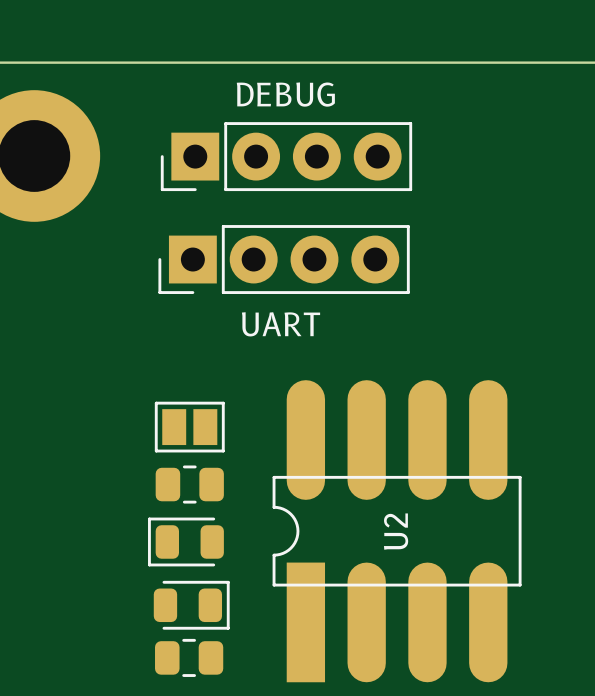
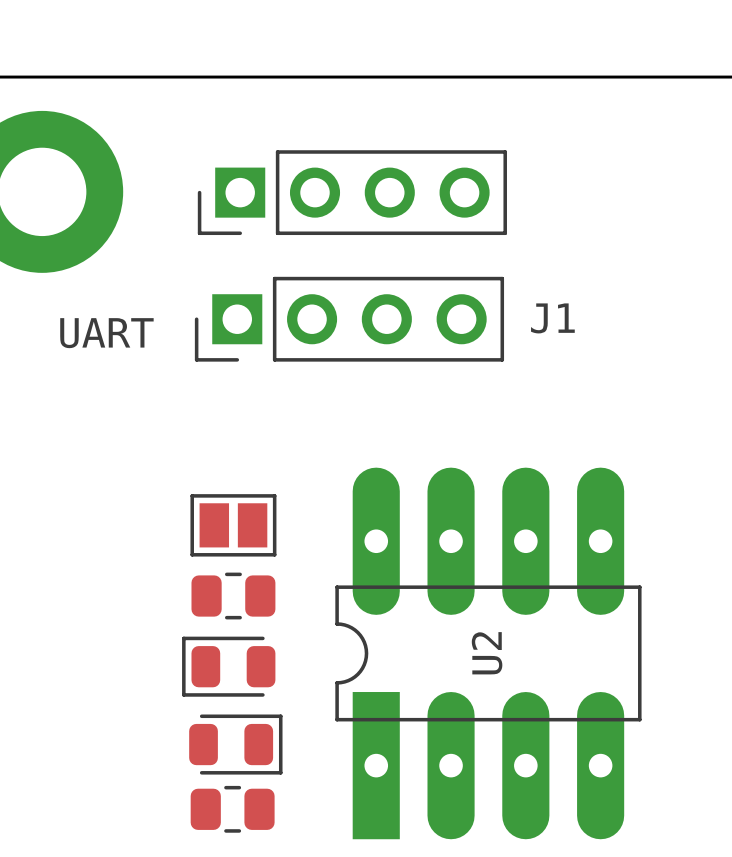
part value: DEBUG (285, 94) -> none
part footprint: [160, 122, 413, 192] -> [197, 150, 507, 236]
part: UART (284, 259) -> none
J1: none -> UART (349, 319)
U2 footprint: [272, 380, 522, 683] -> [335, 467, 642, 840]

